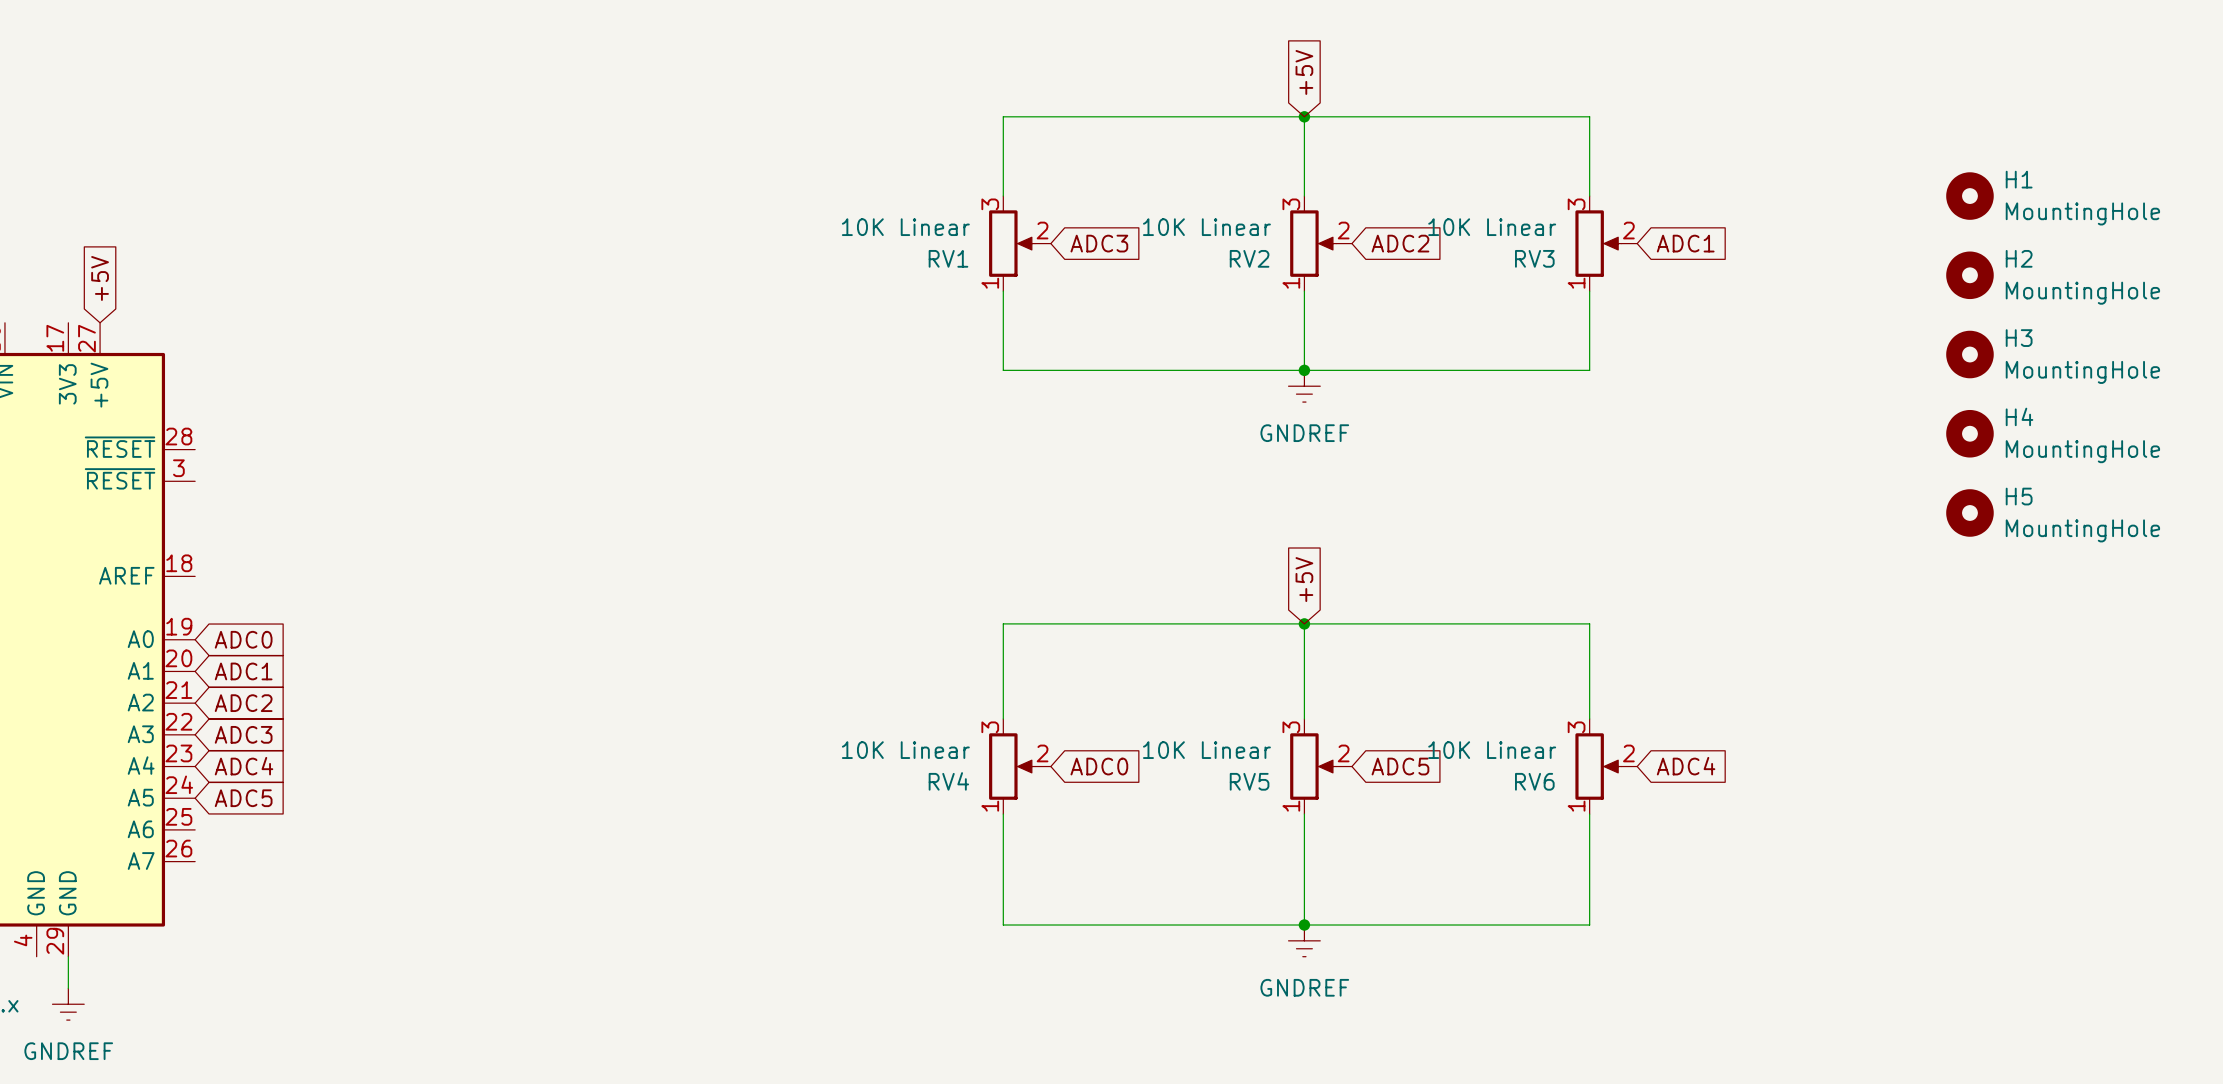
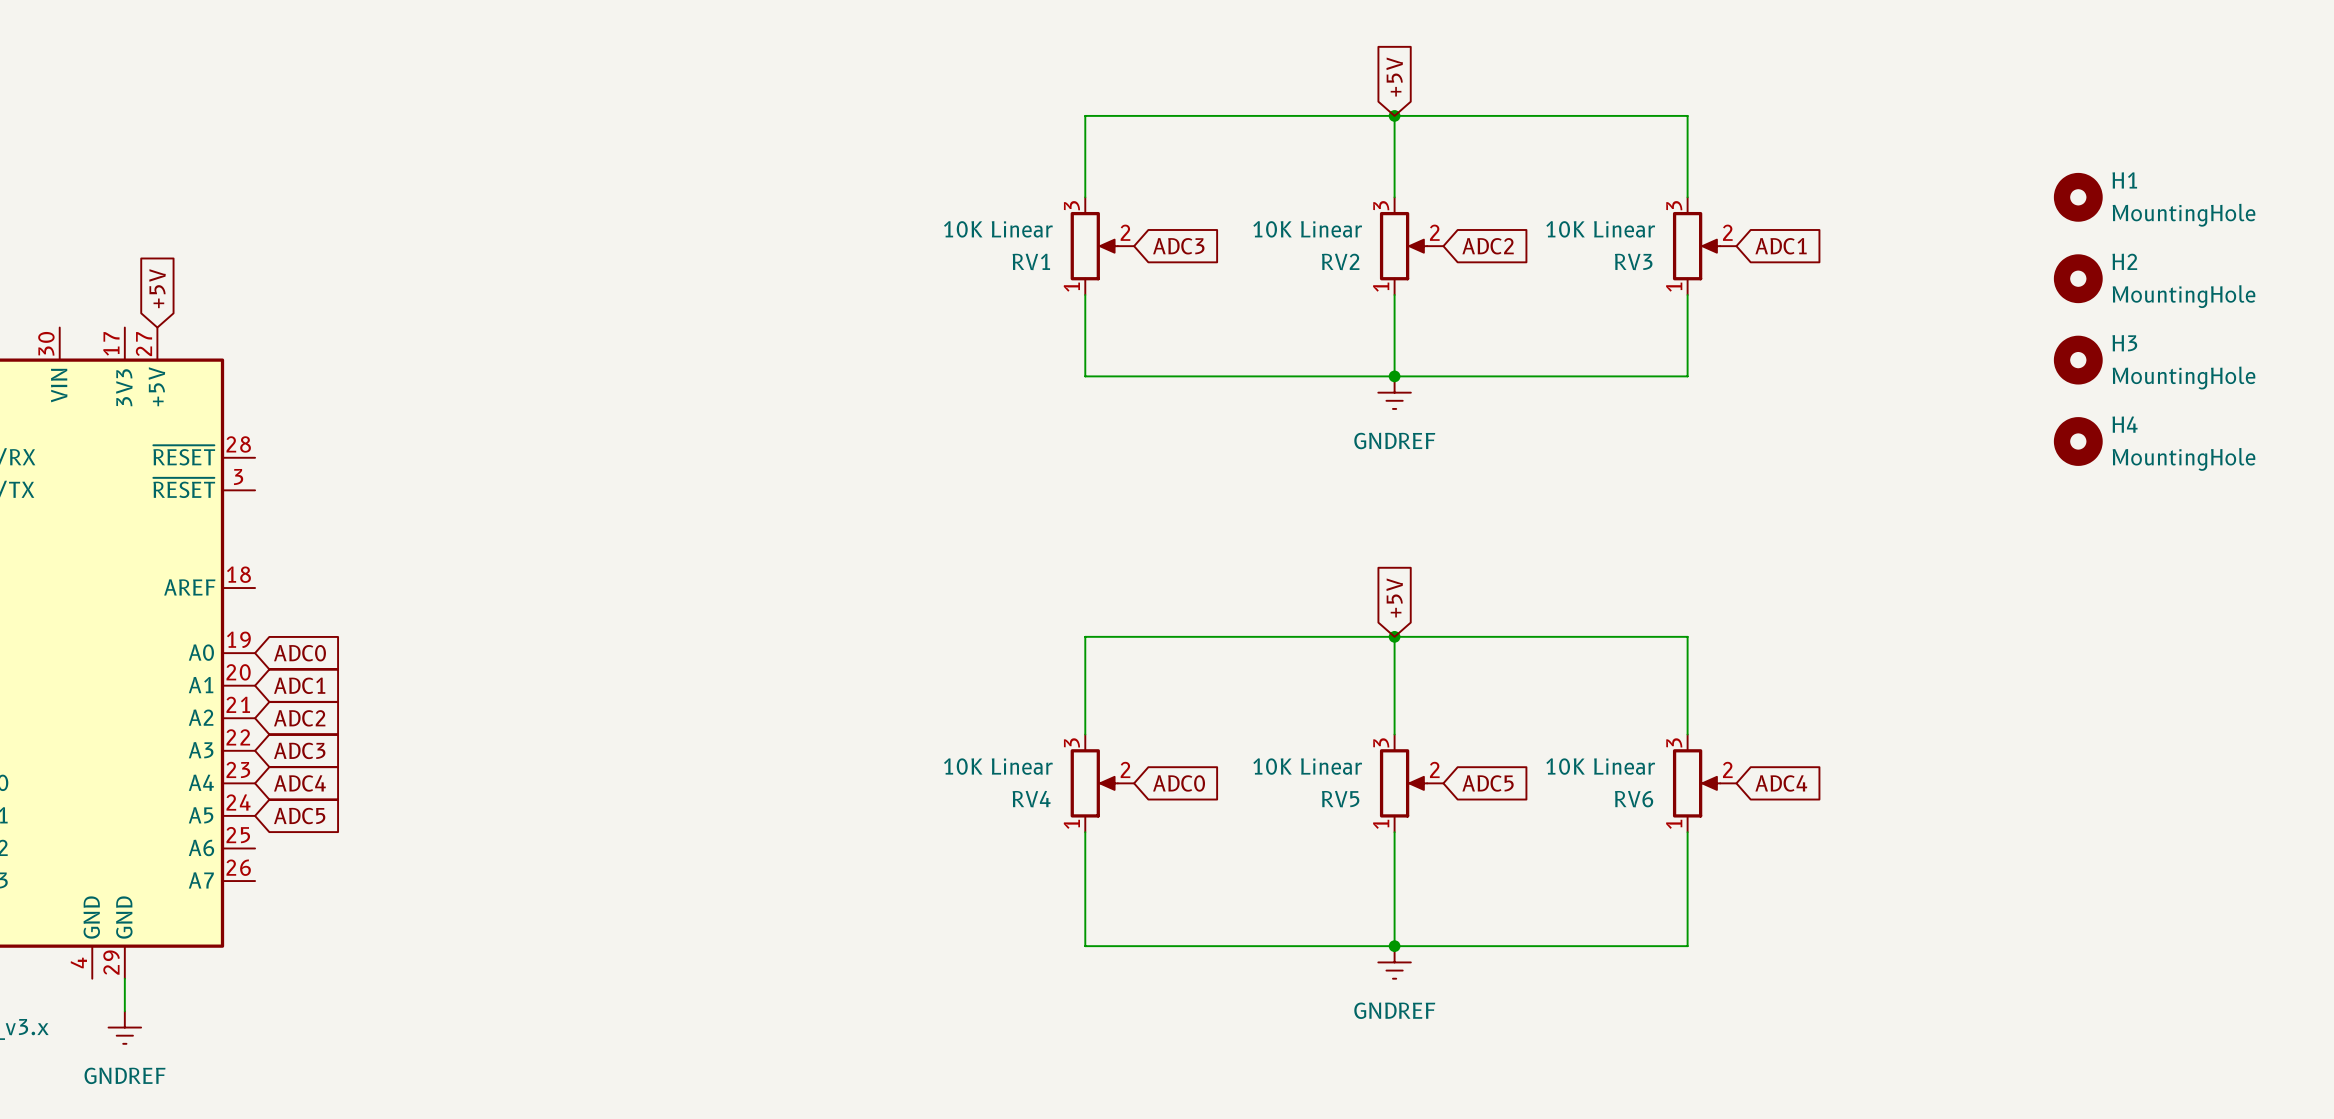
H5: MountingHole (1969, 512) -> none

